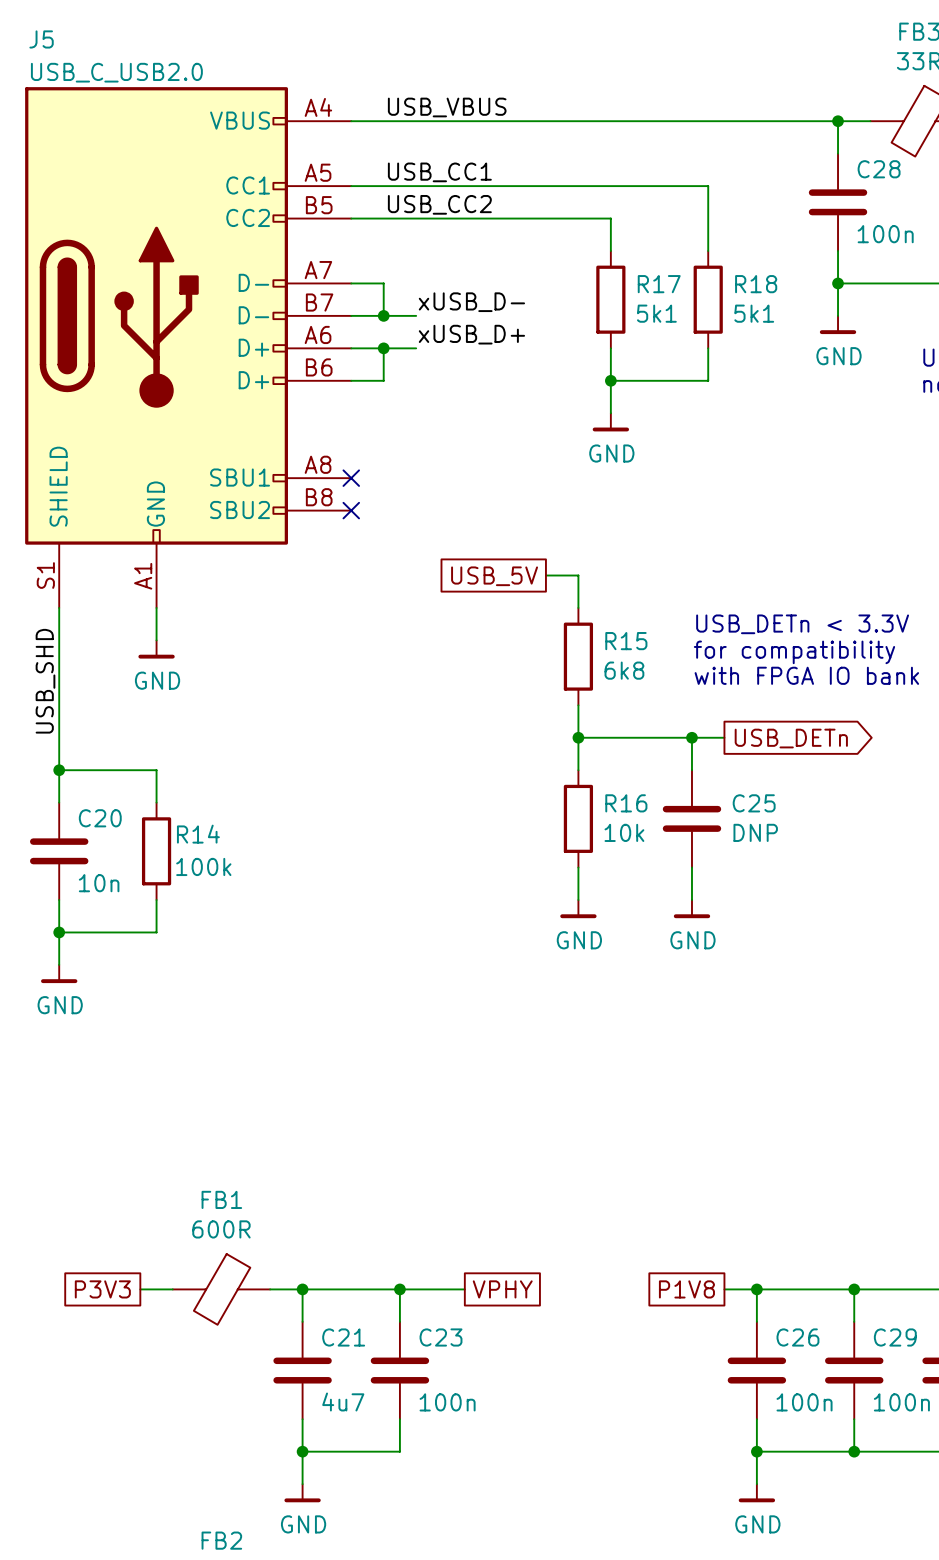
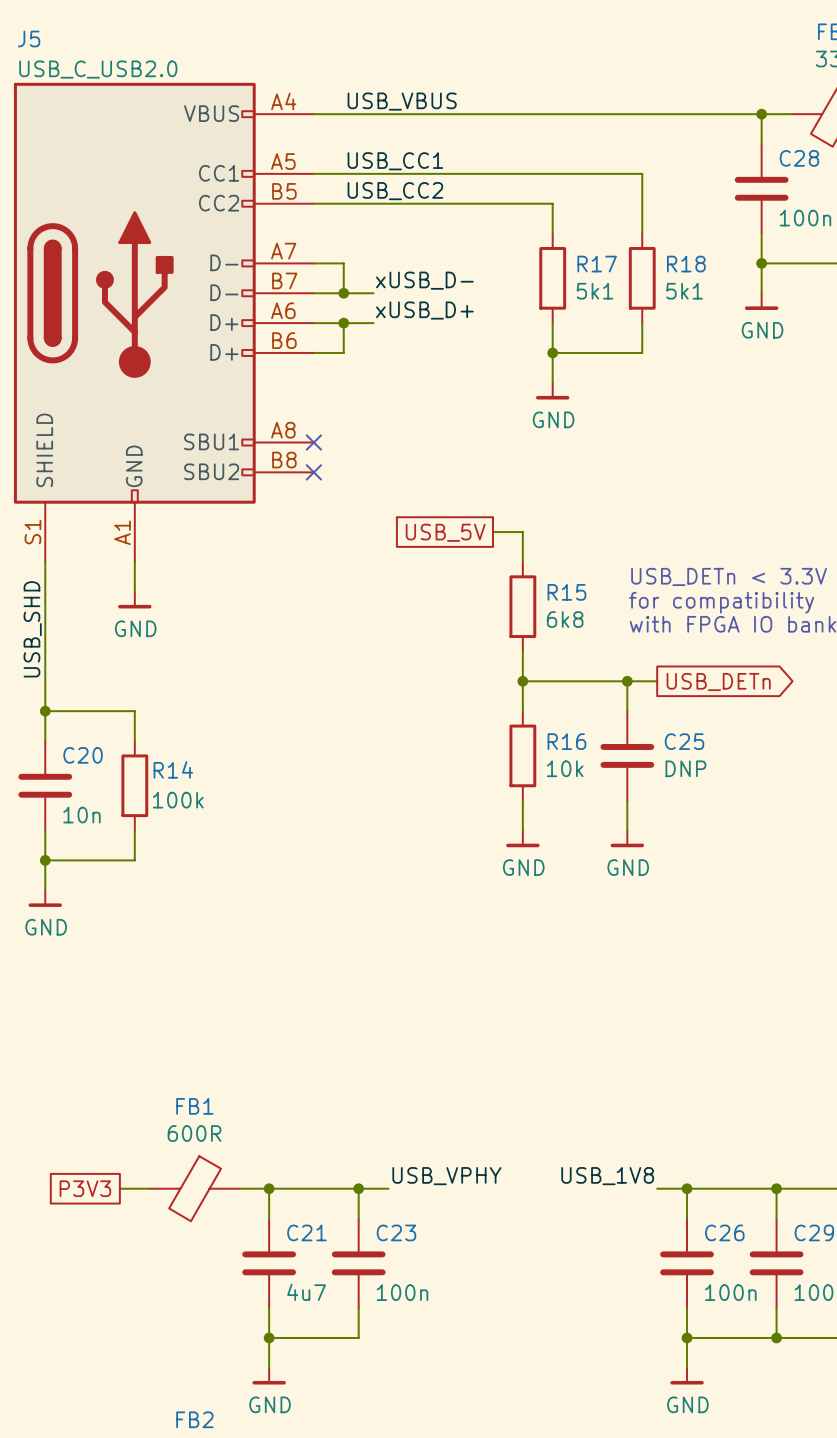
label: none -> USB_VPHY (446, 1176)
label: none -> USB_1V8 (607, 1176)
wire: (432, 1289) (464, 1289) -> none
global label: VPHY (502, 1289) -> none
global label: P1V8 (686, 1289) -> none

